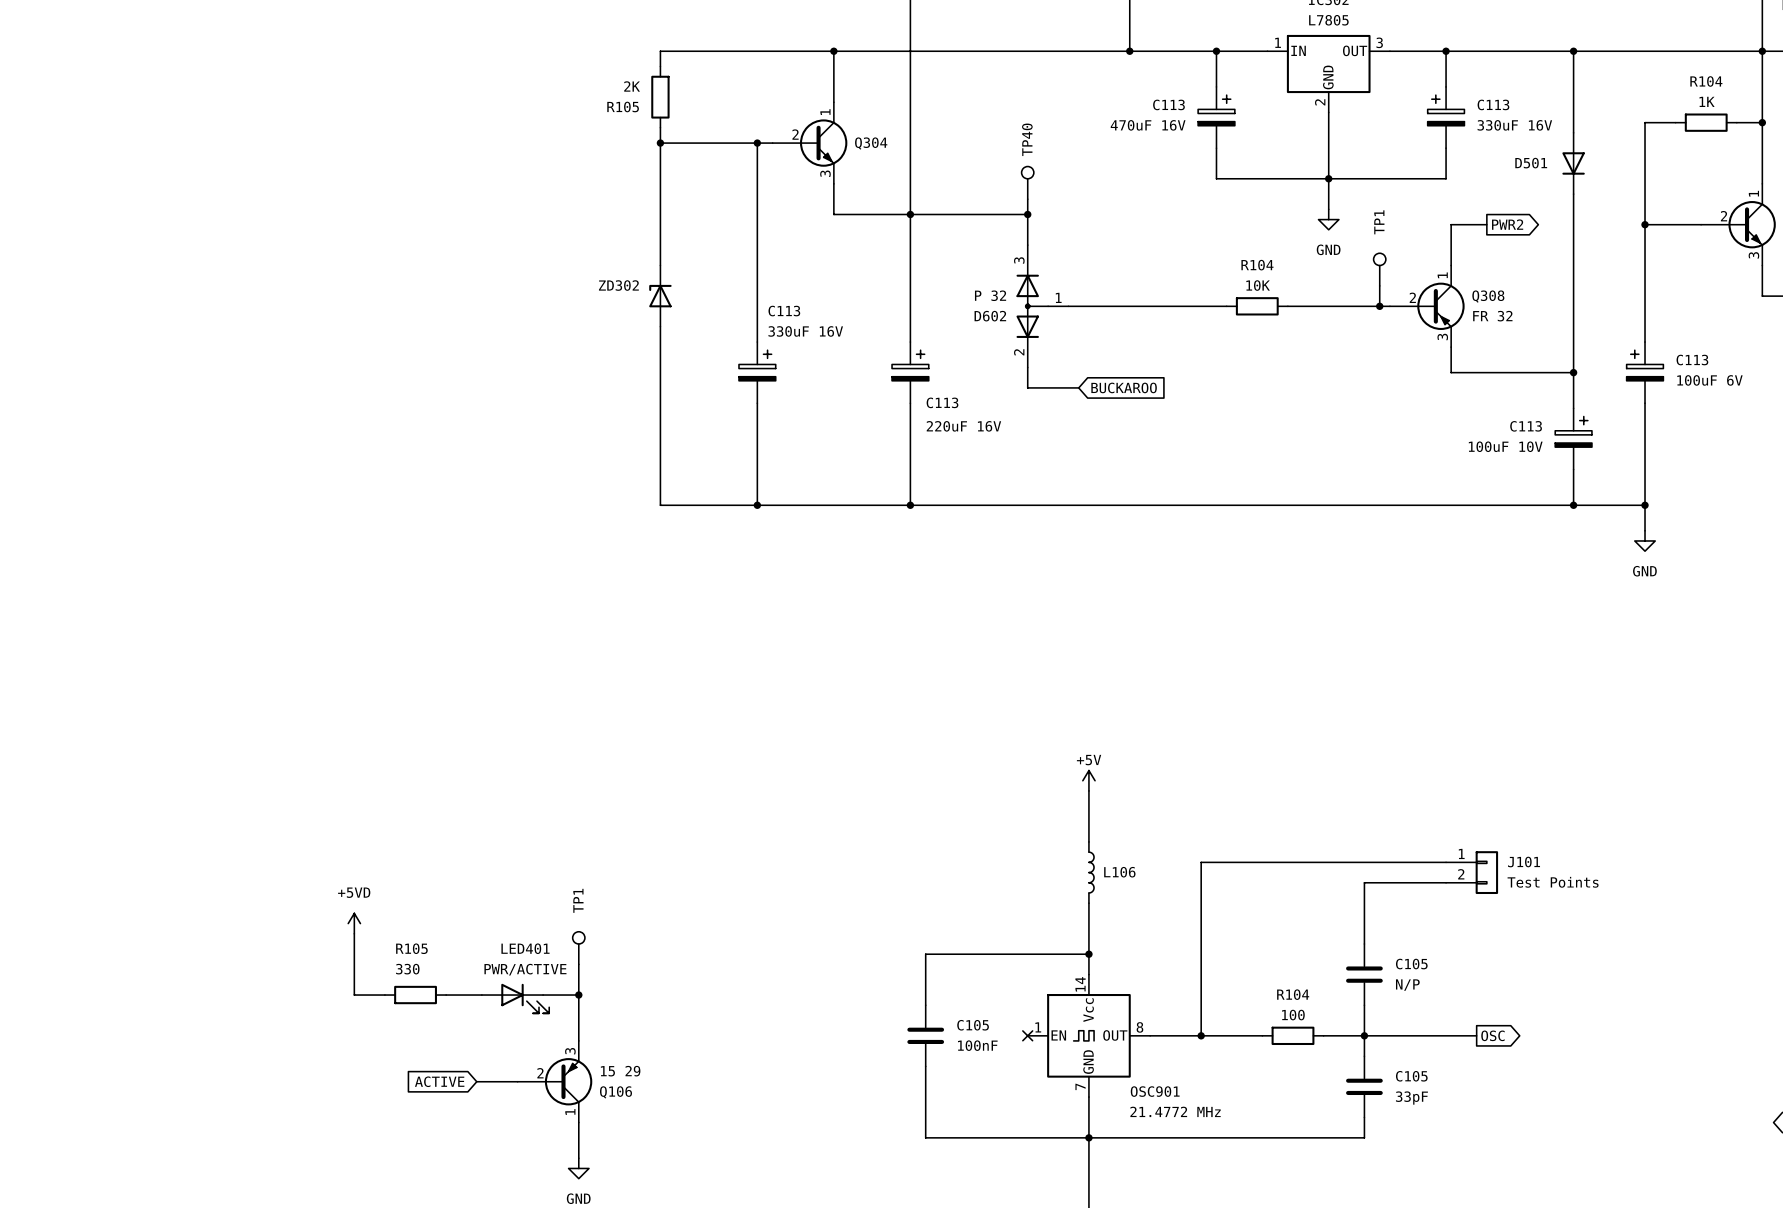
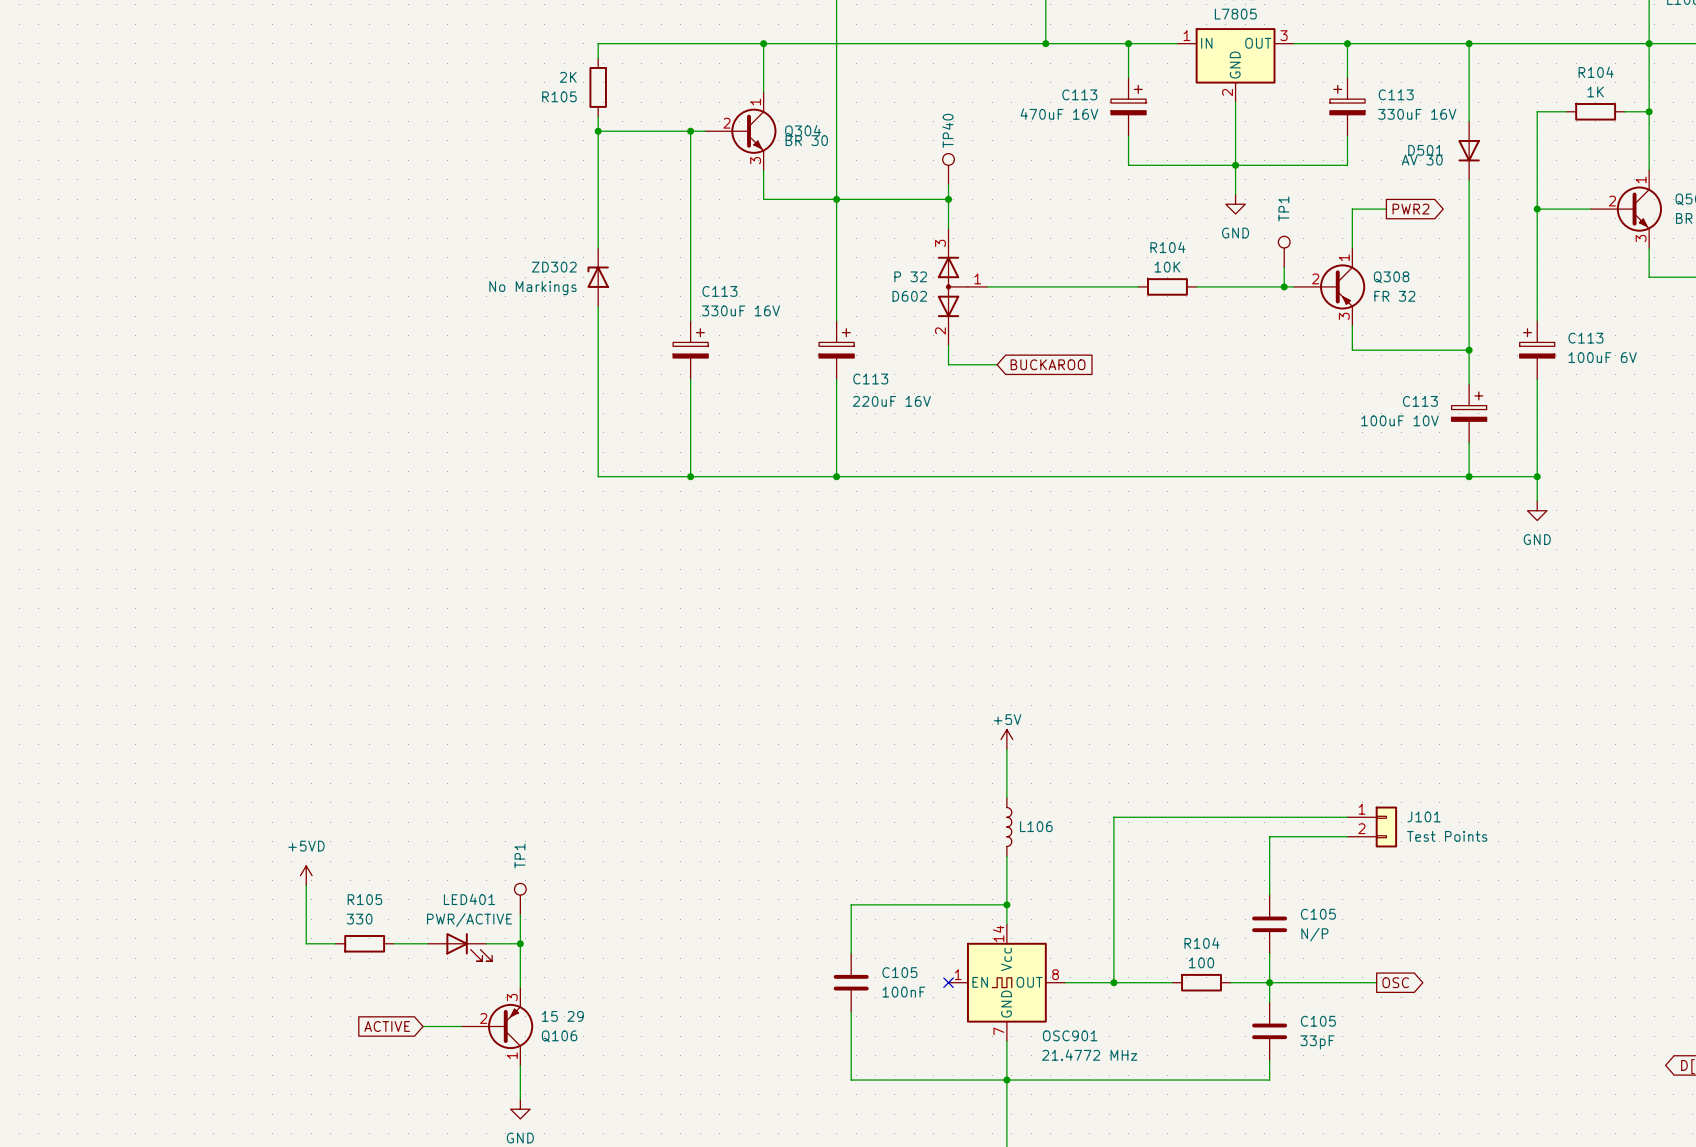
Q304 value: none -> BR 30 (806, 140)
D501 value: none -> AV 30 (1422, 160)
ZD302 value: none -> No Markings (533, 288)

